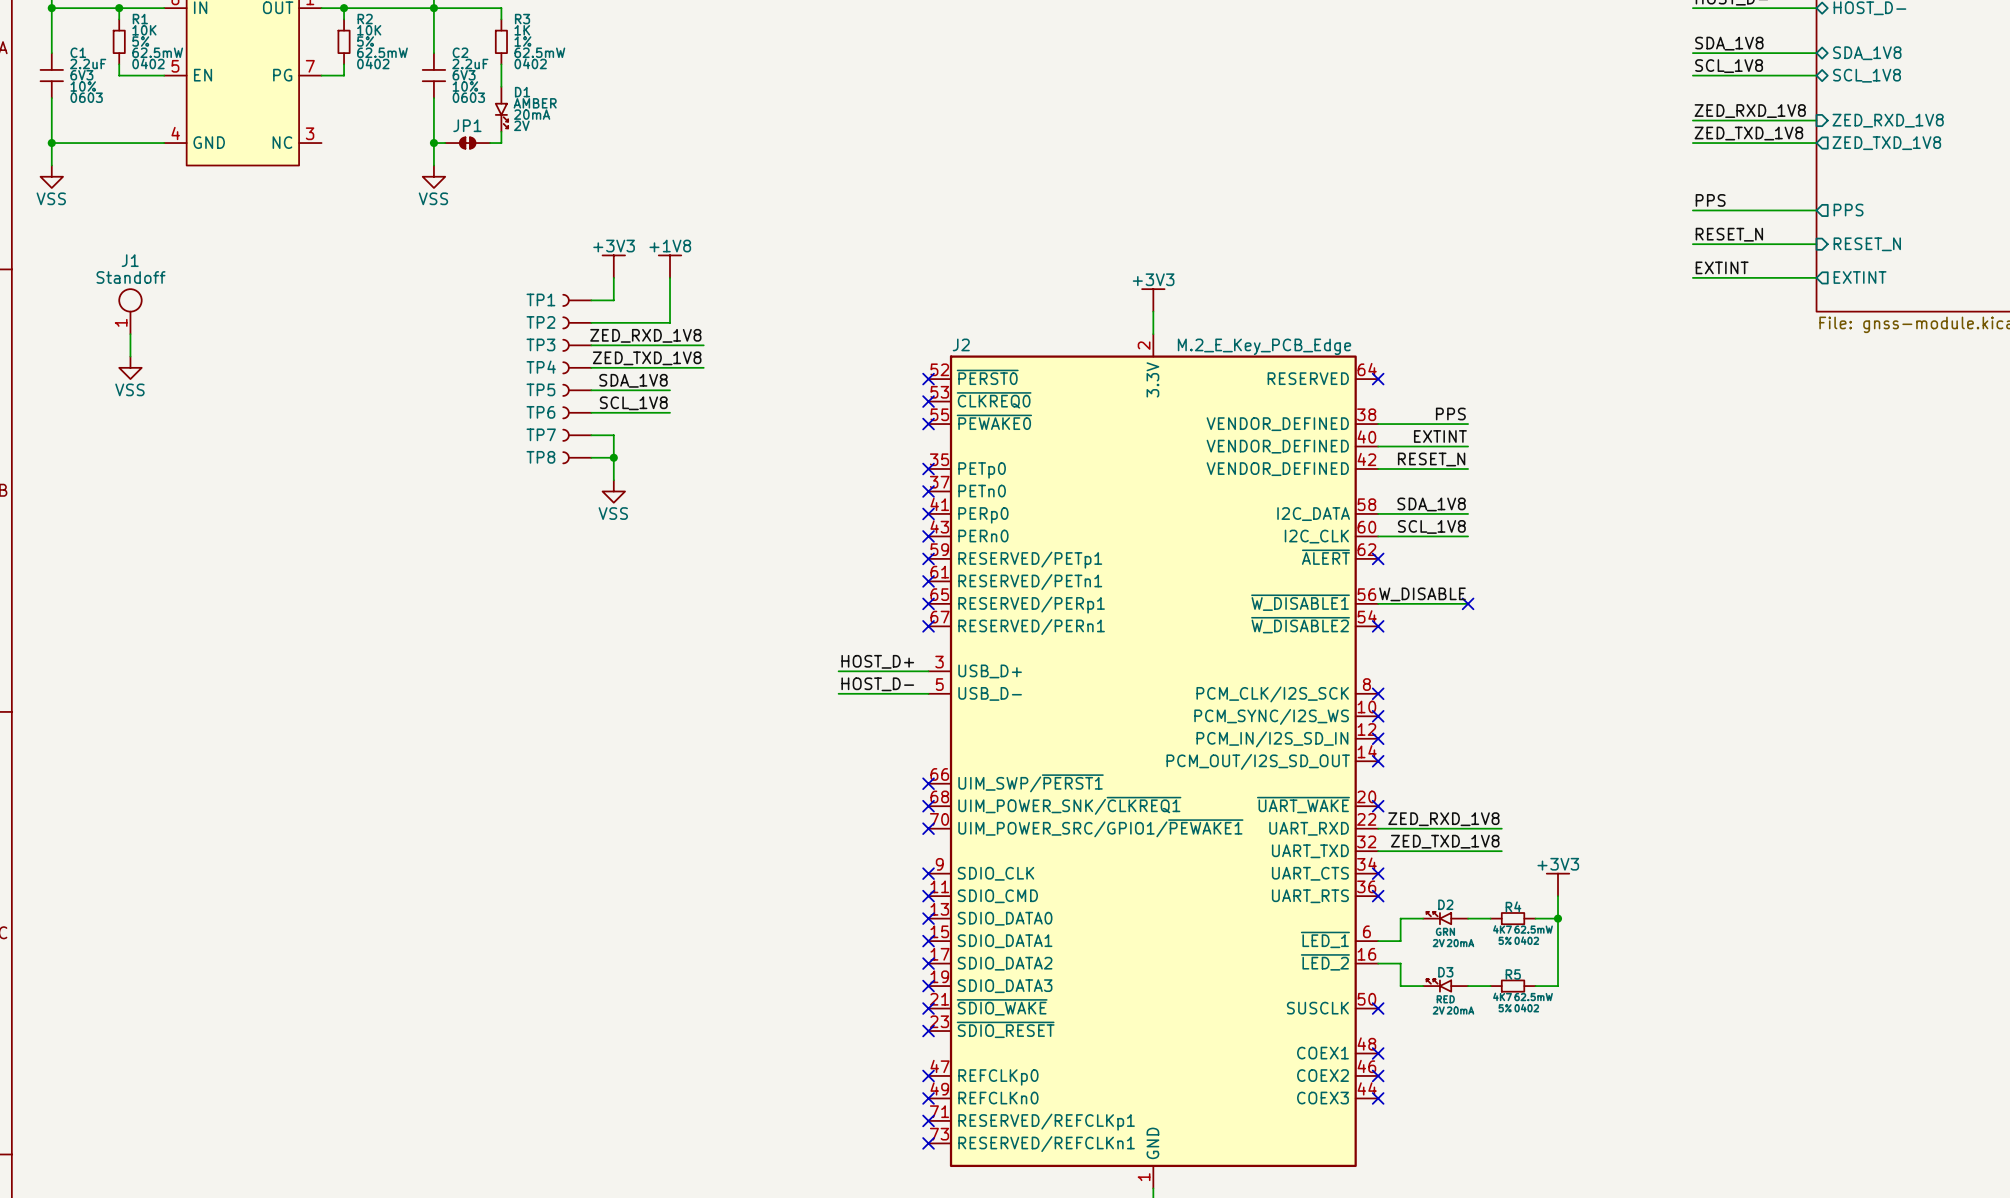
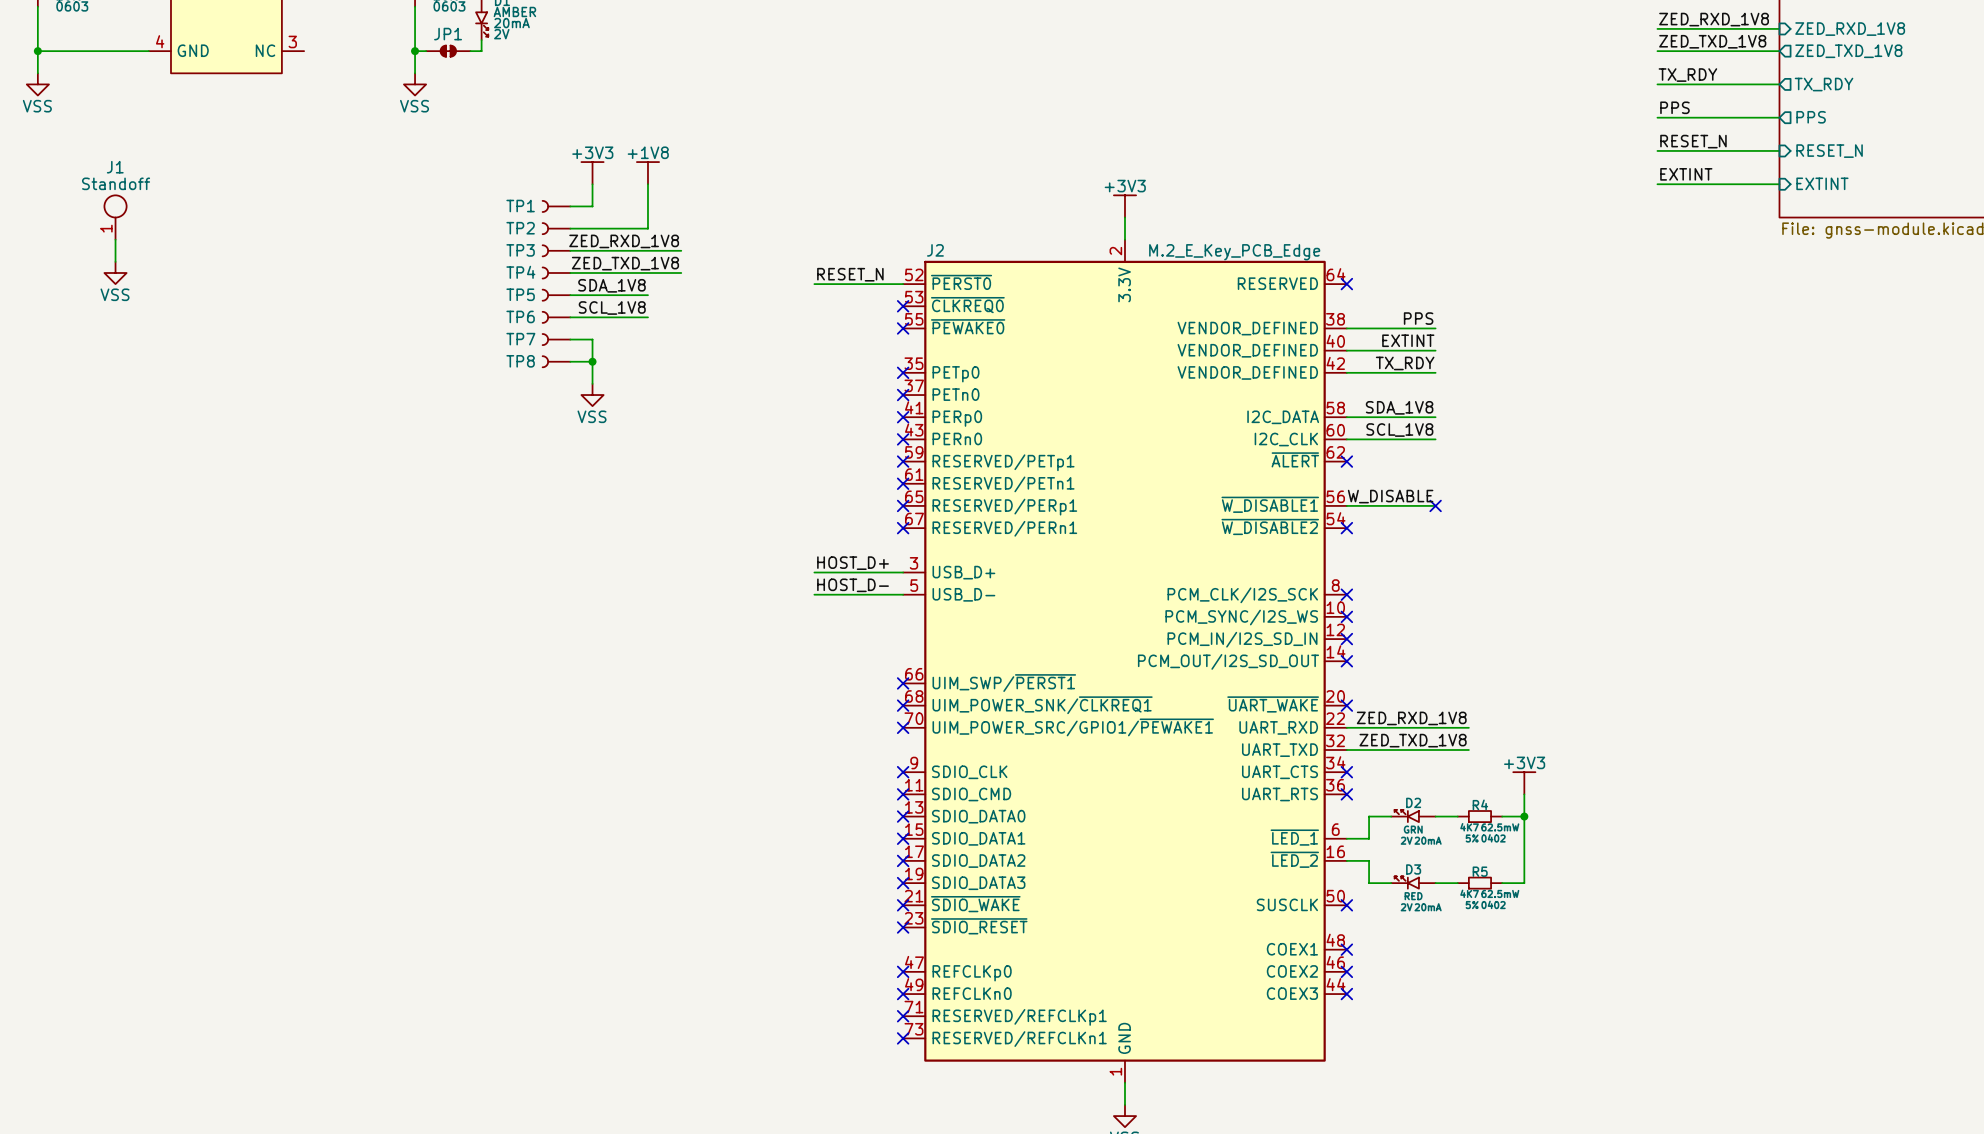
label: none -> TX_RDY (1687, 75)
wire: none -> (1657, 84) (1779, 84)
sheet pin: none -> TX_RDY (1824, 84)
sheet pin shape: output (1860, 277) -> input (1822, 183)
label: none -> RESET_N (850, 274)
wire: none -> (814, 284) (903, 284)
no-connect mark: (928, 379) -> none
label: RESET_N (1431, 459) -> TX_RDY (1405, 363)

